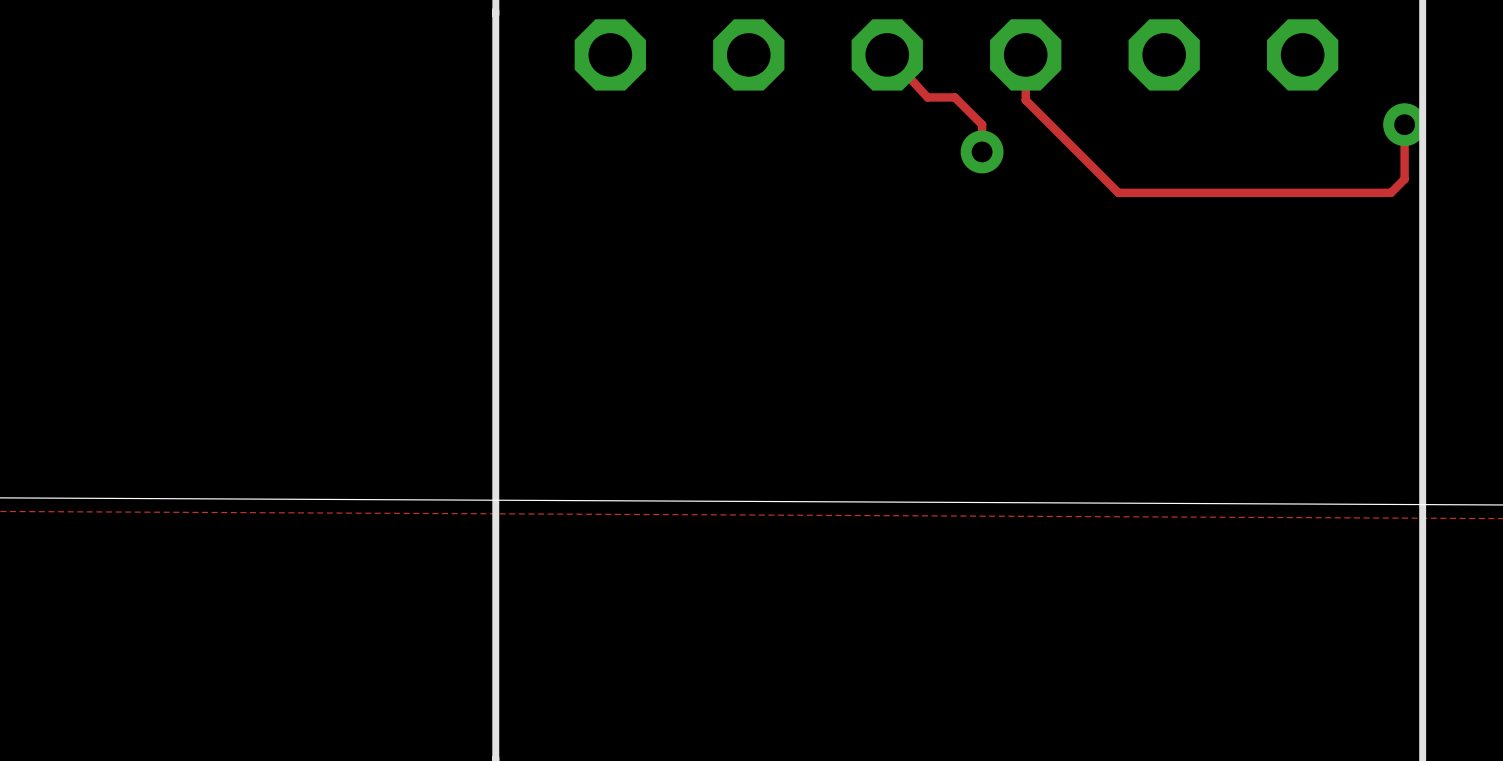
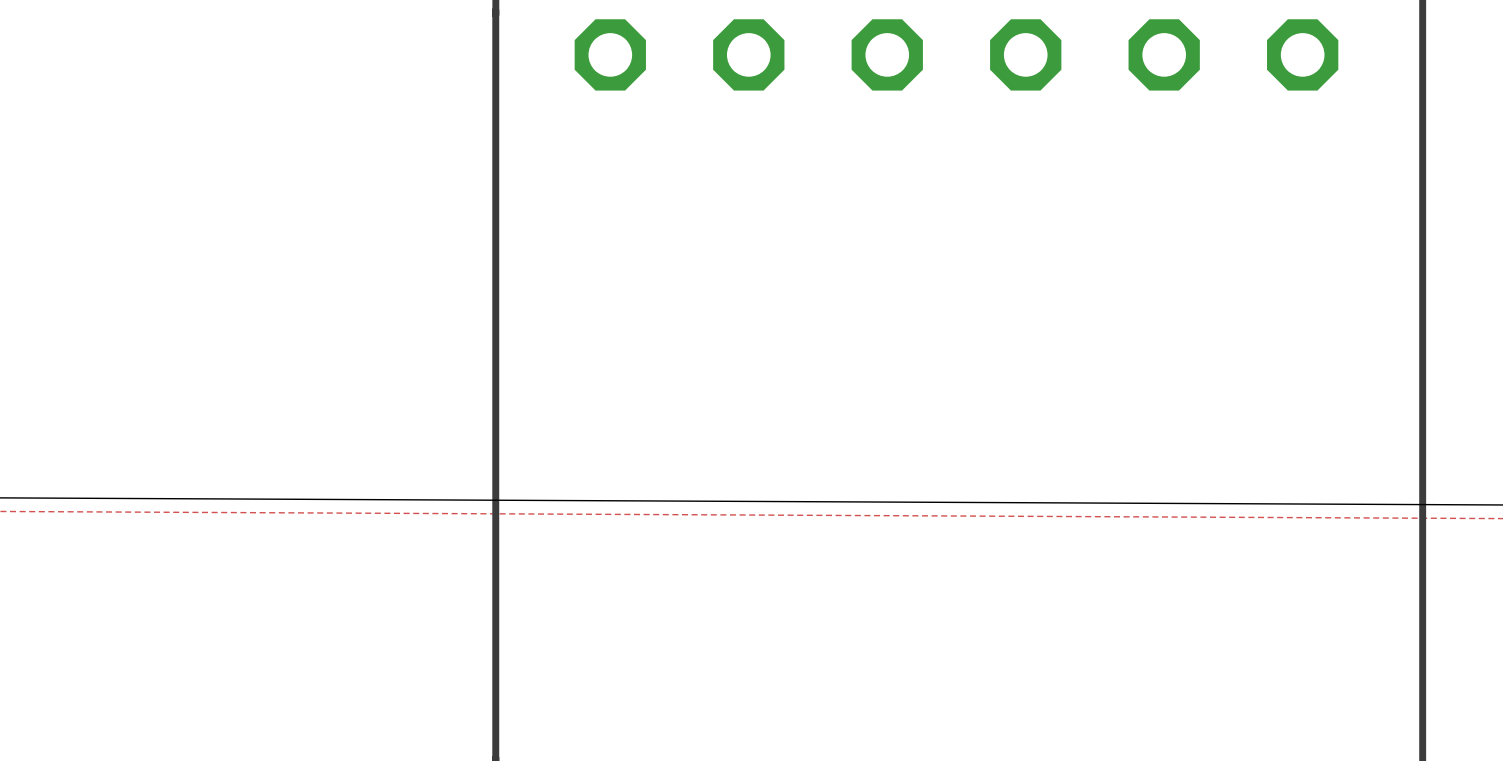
track: (887, 54) (927, 97) (954, 97) (982, 124) (982, 151) -> none
track: (1025, 54) (1025, 100) (1118, 192) (1390, 192) (1404, 179) (1404, 124) -> none
via: (1404, 124) -> none
via: (982, 151) -> none

